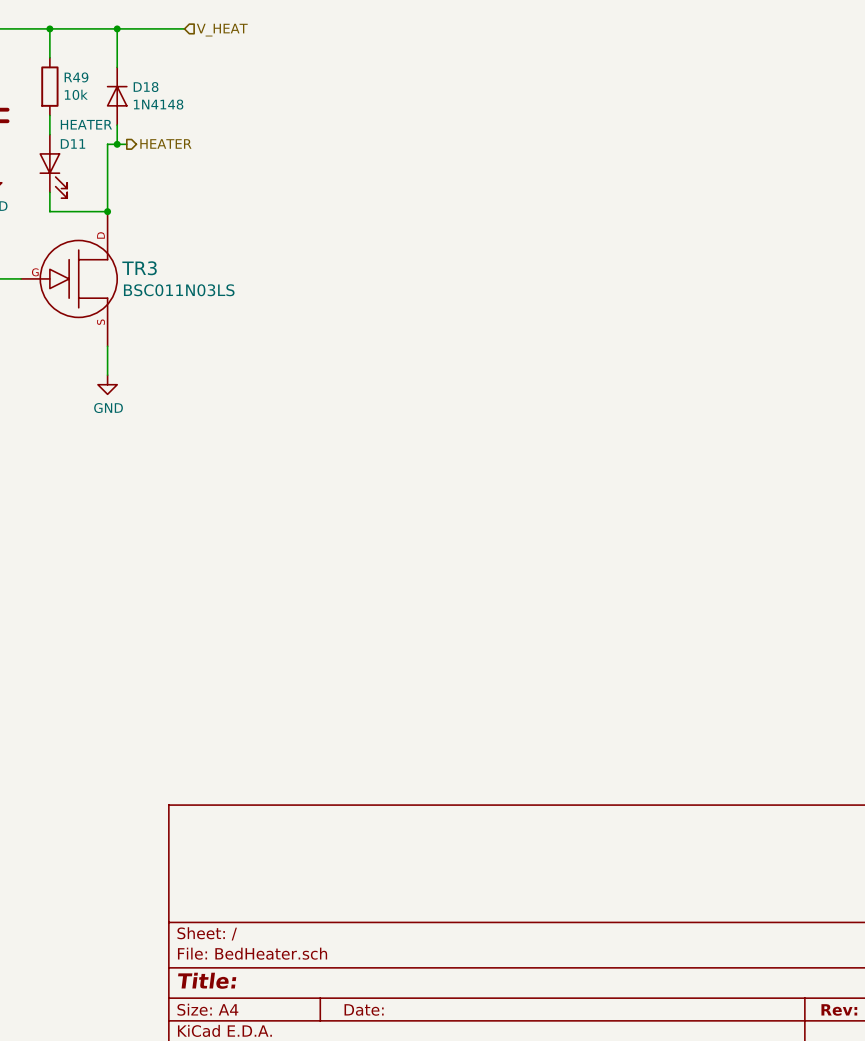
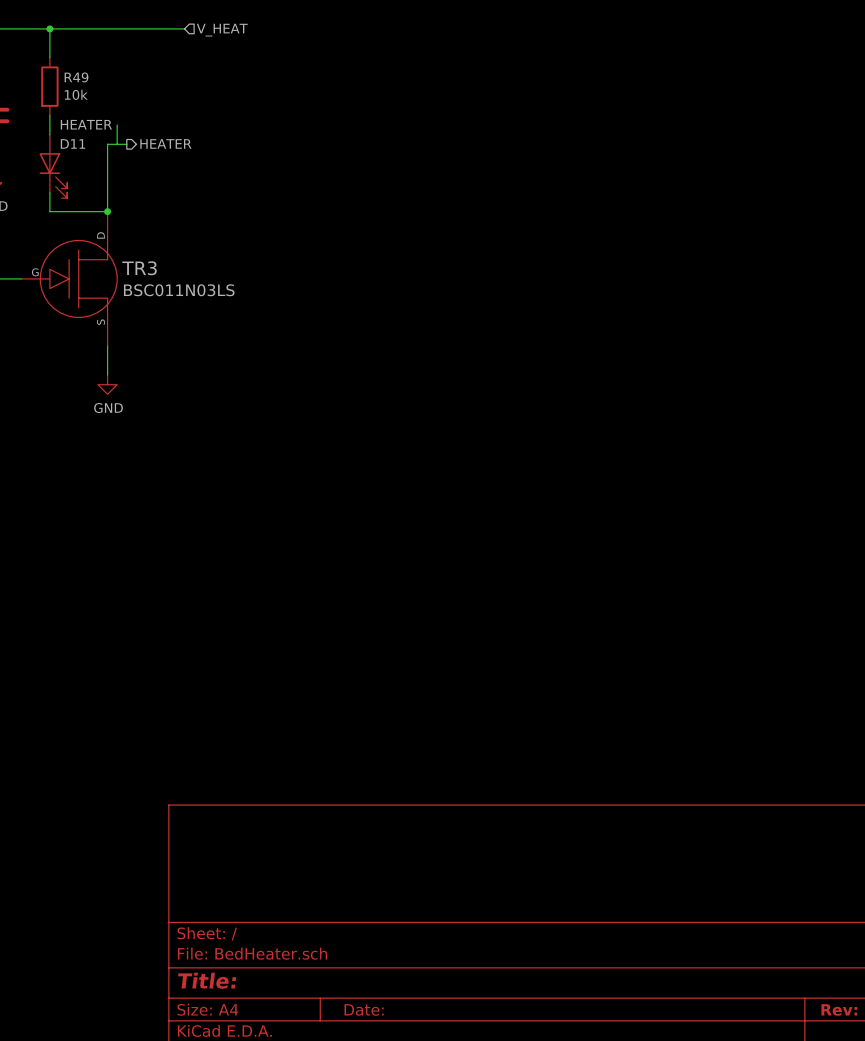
wire: (117, 28) (117, 67) -> none
junction: (117, 28) -> none
D18: 1N4148 (117, 96) -> none
junction: (117, 144) -> none

